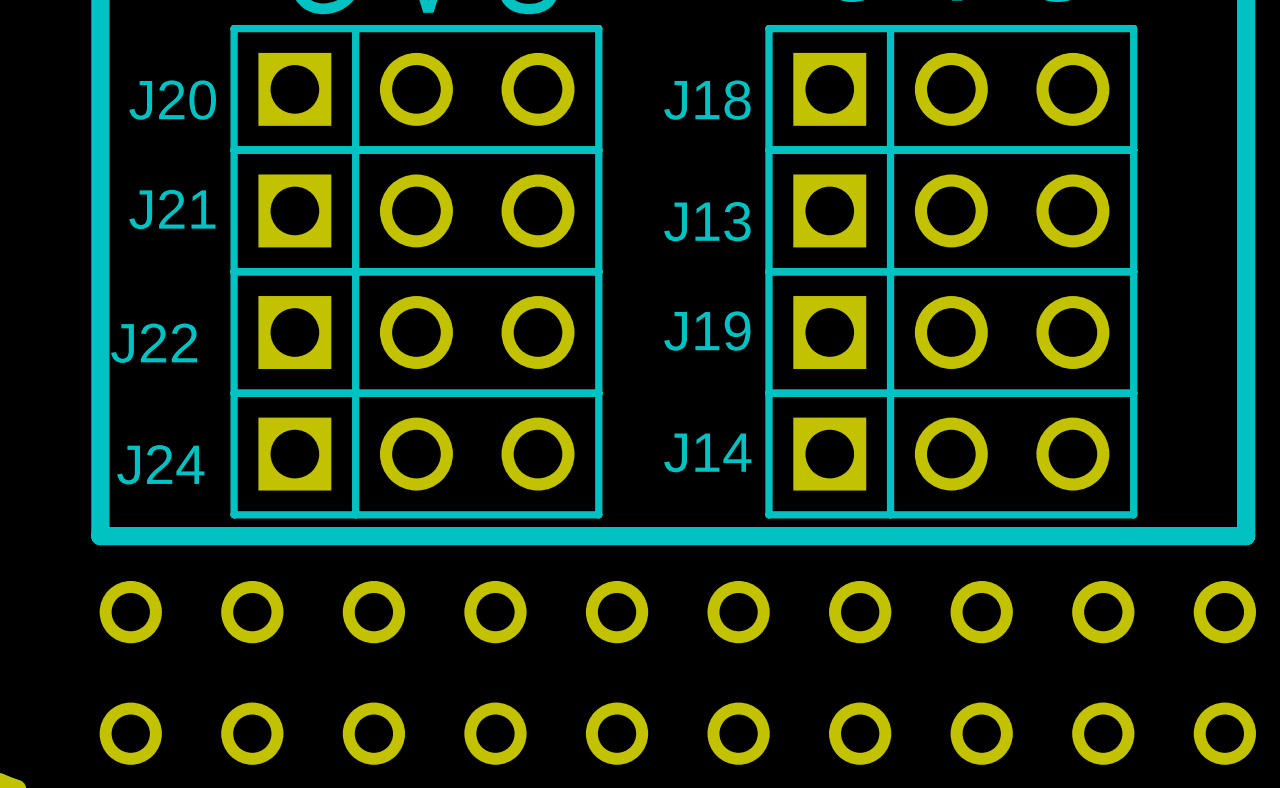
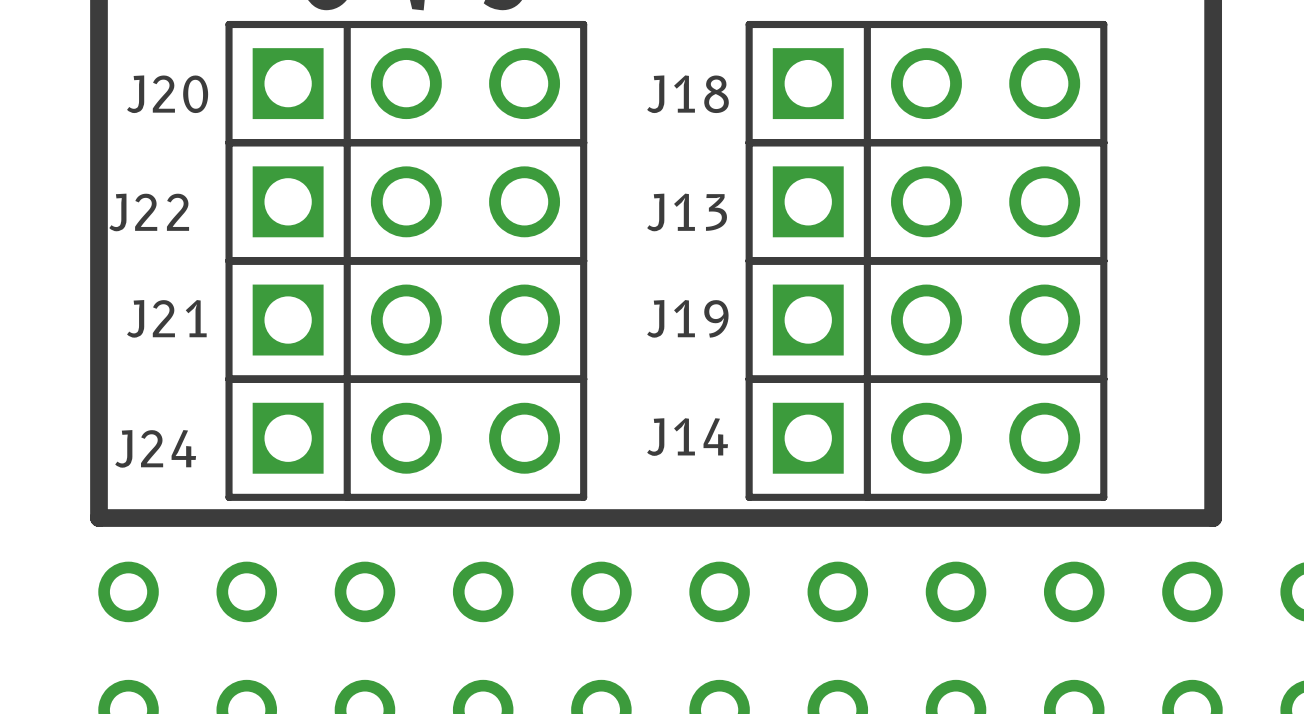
J21 name: J21 (172, 209) -> J22 (149, 212)
J22 name: J22 (154, 343) -> J21 (166, 318)

